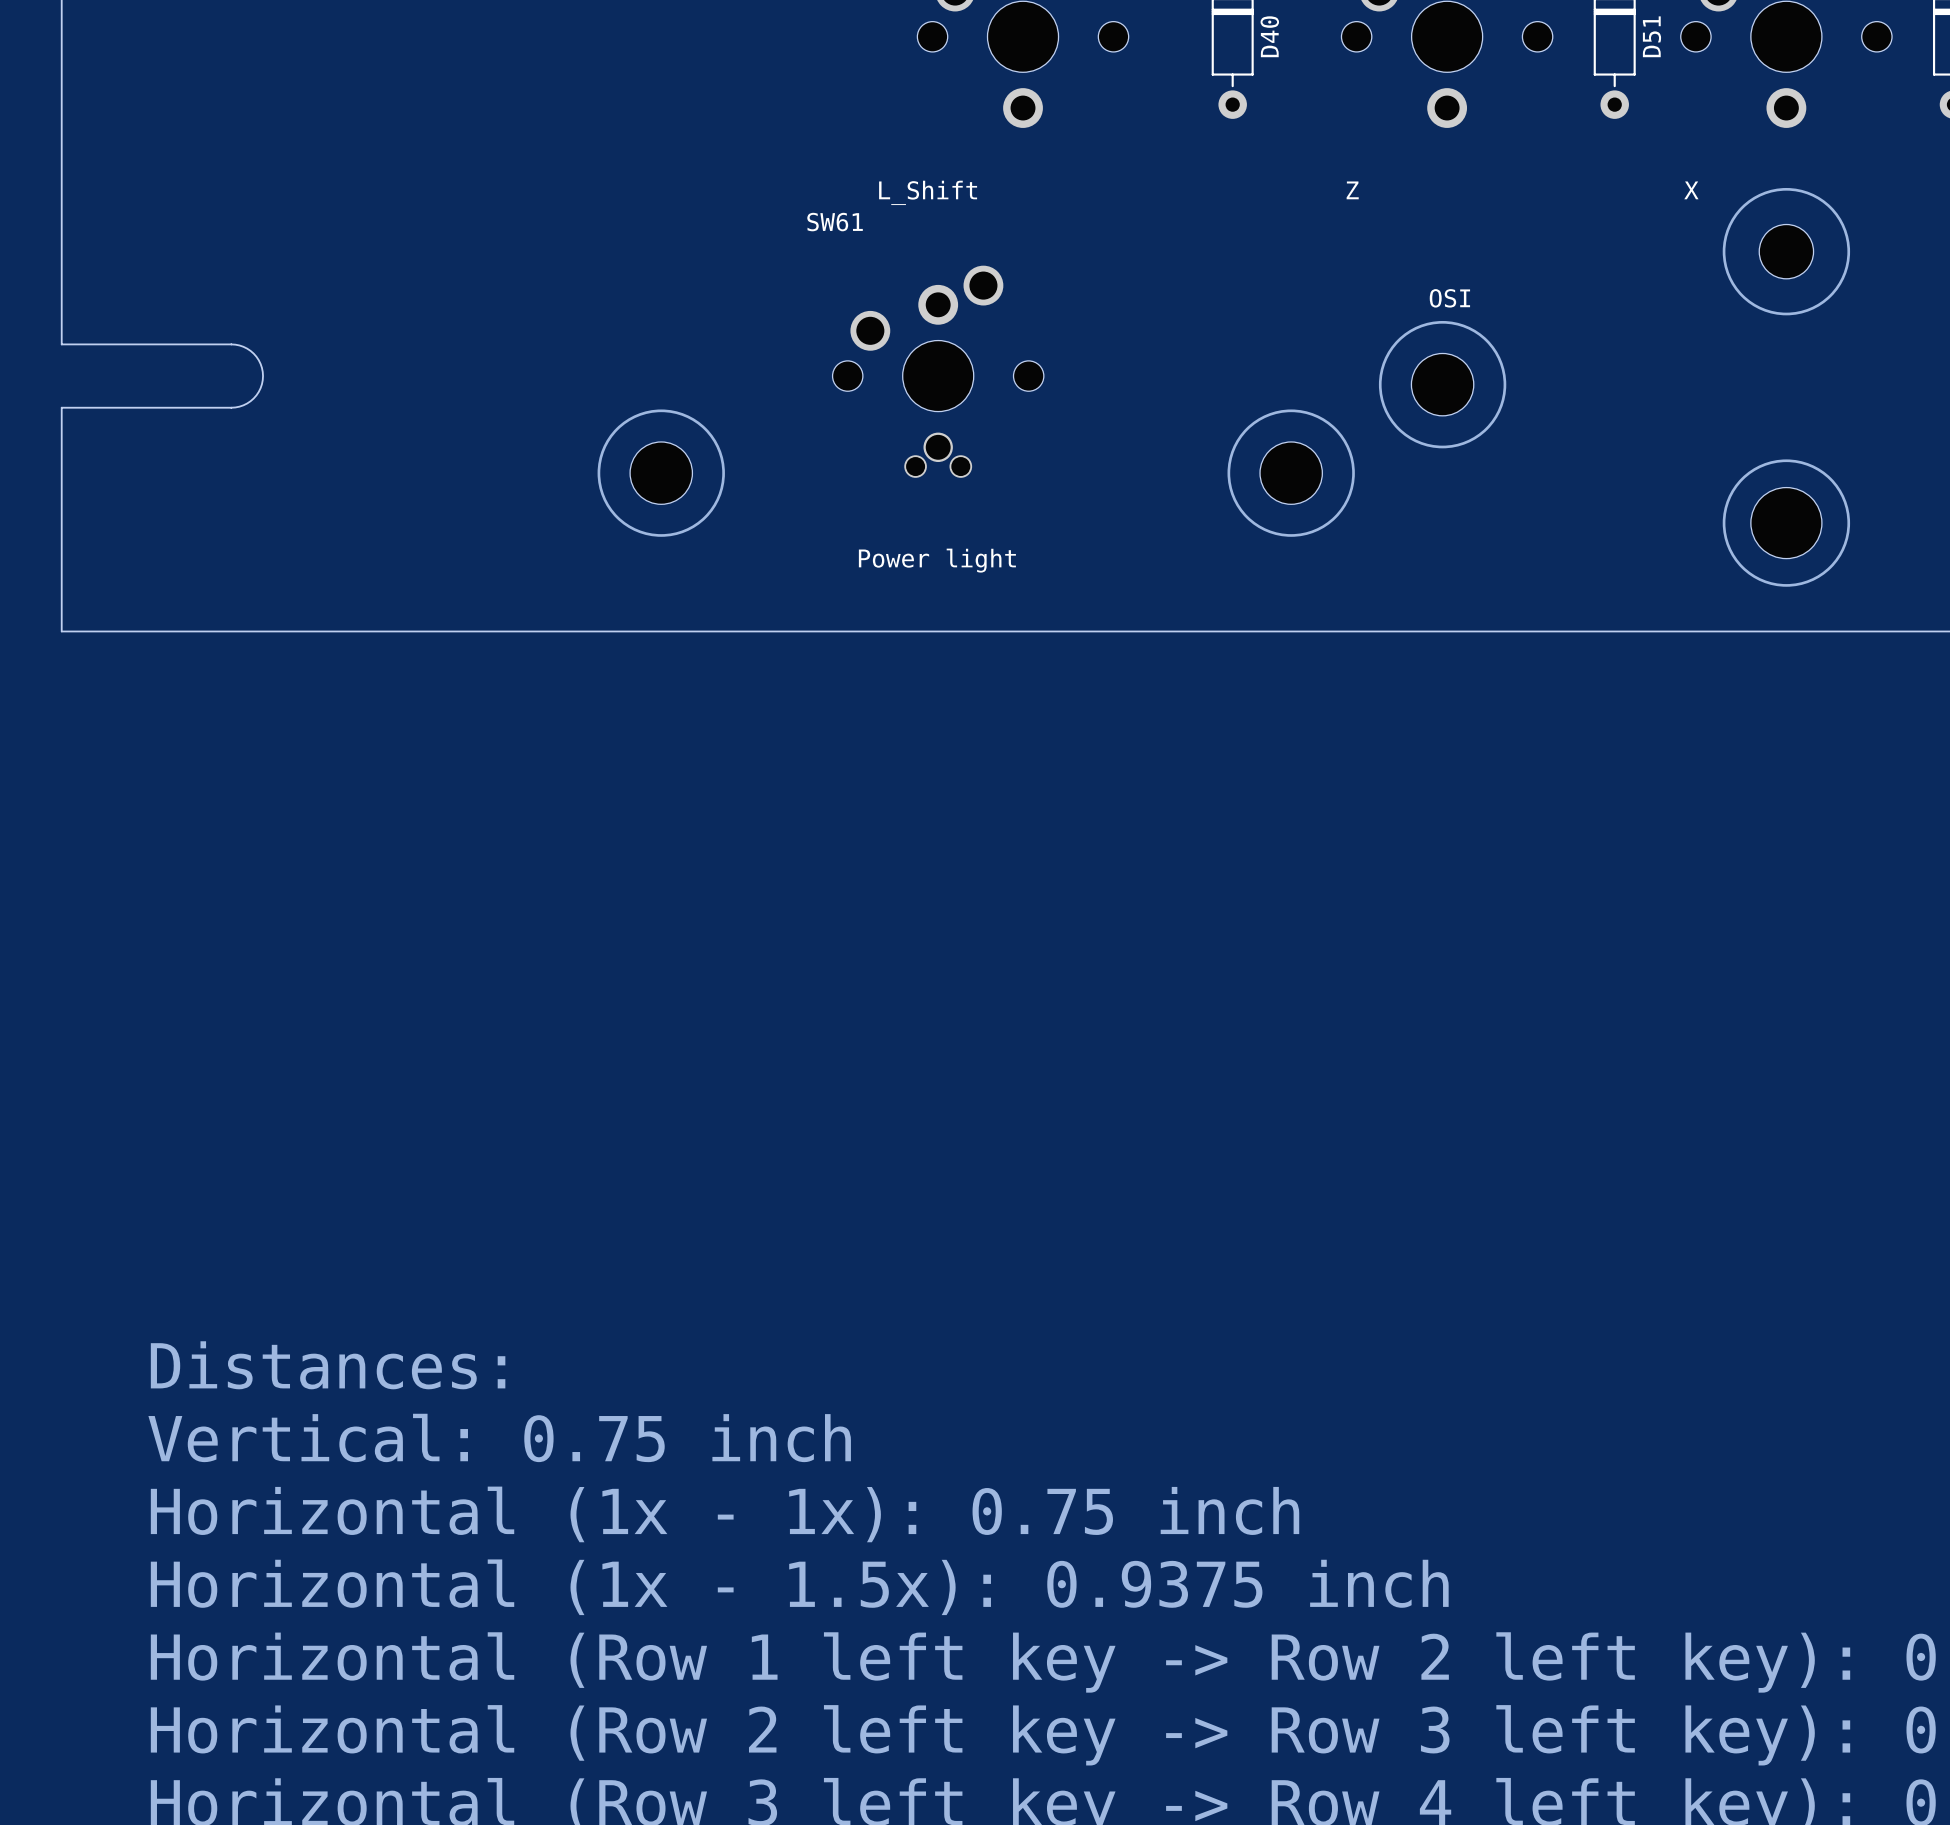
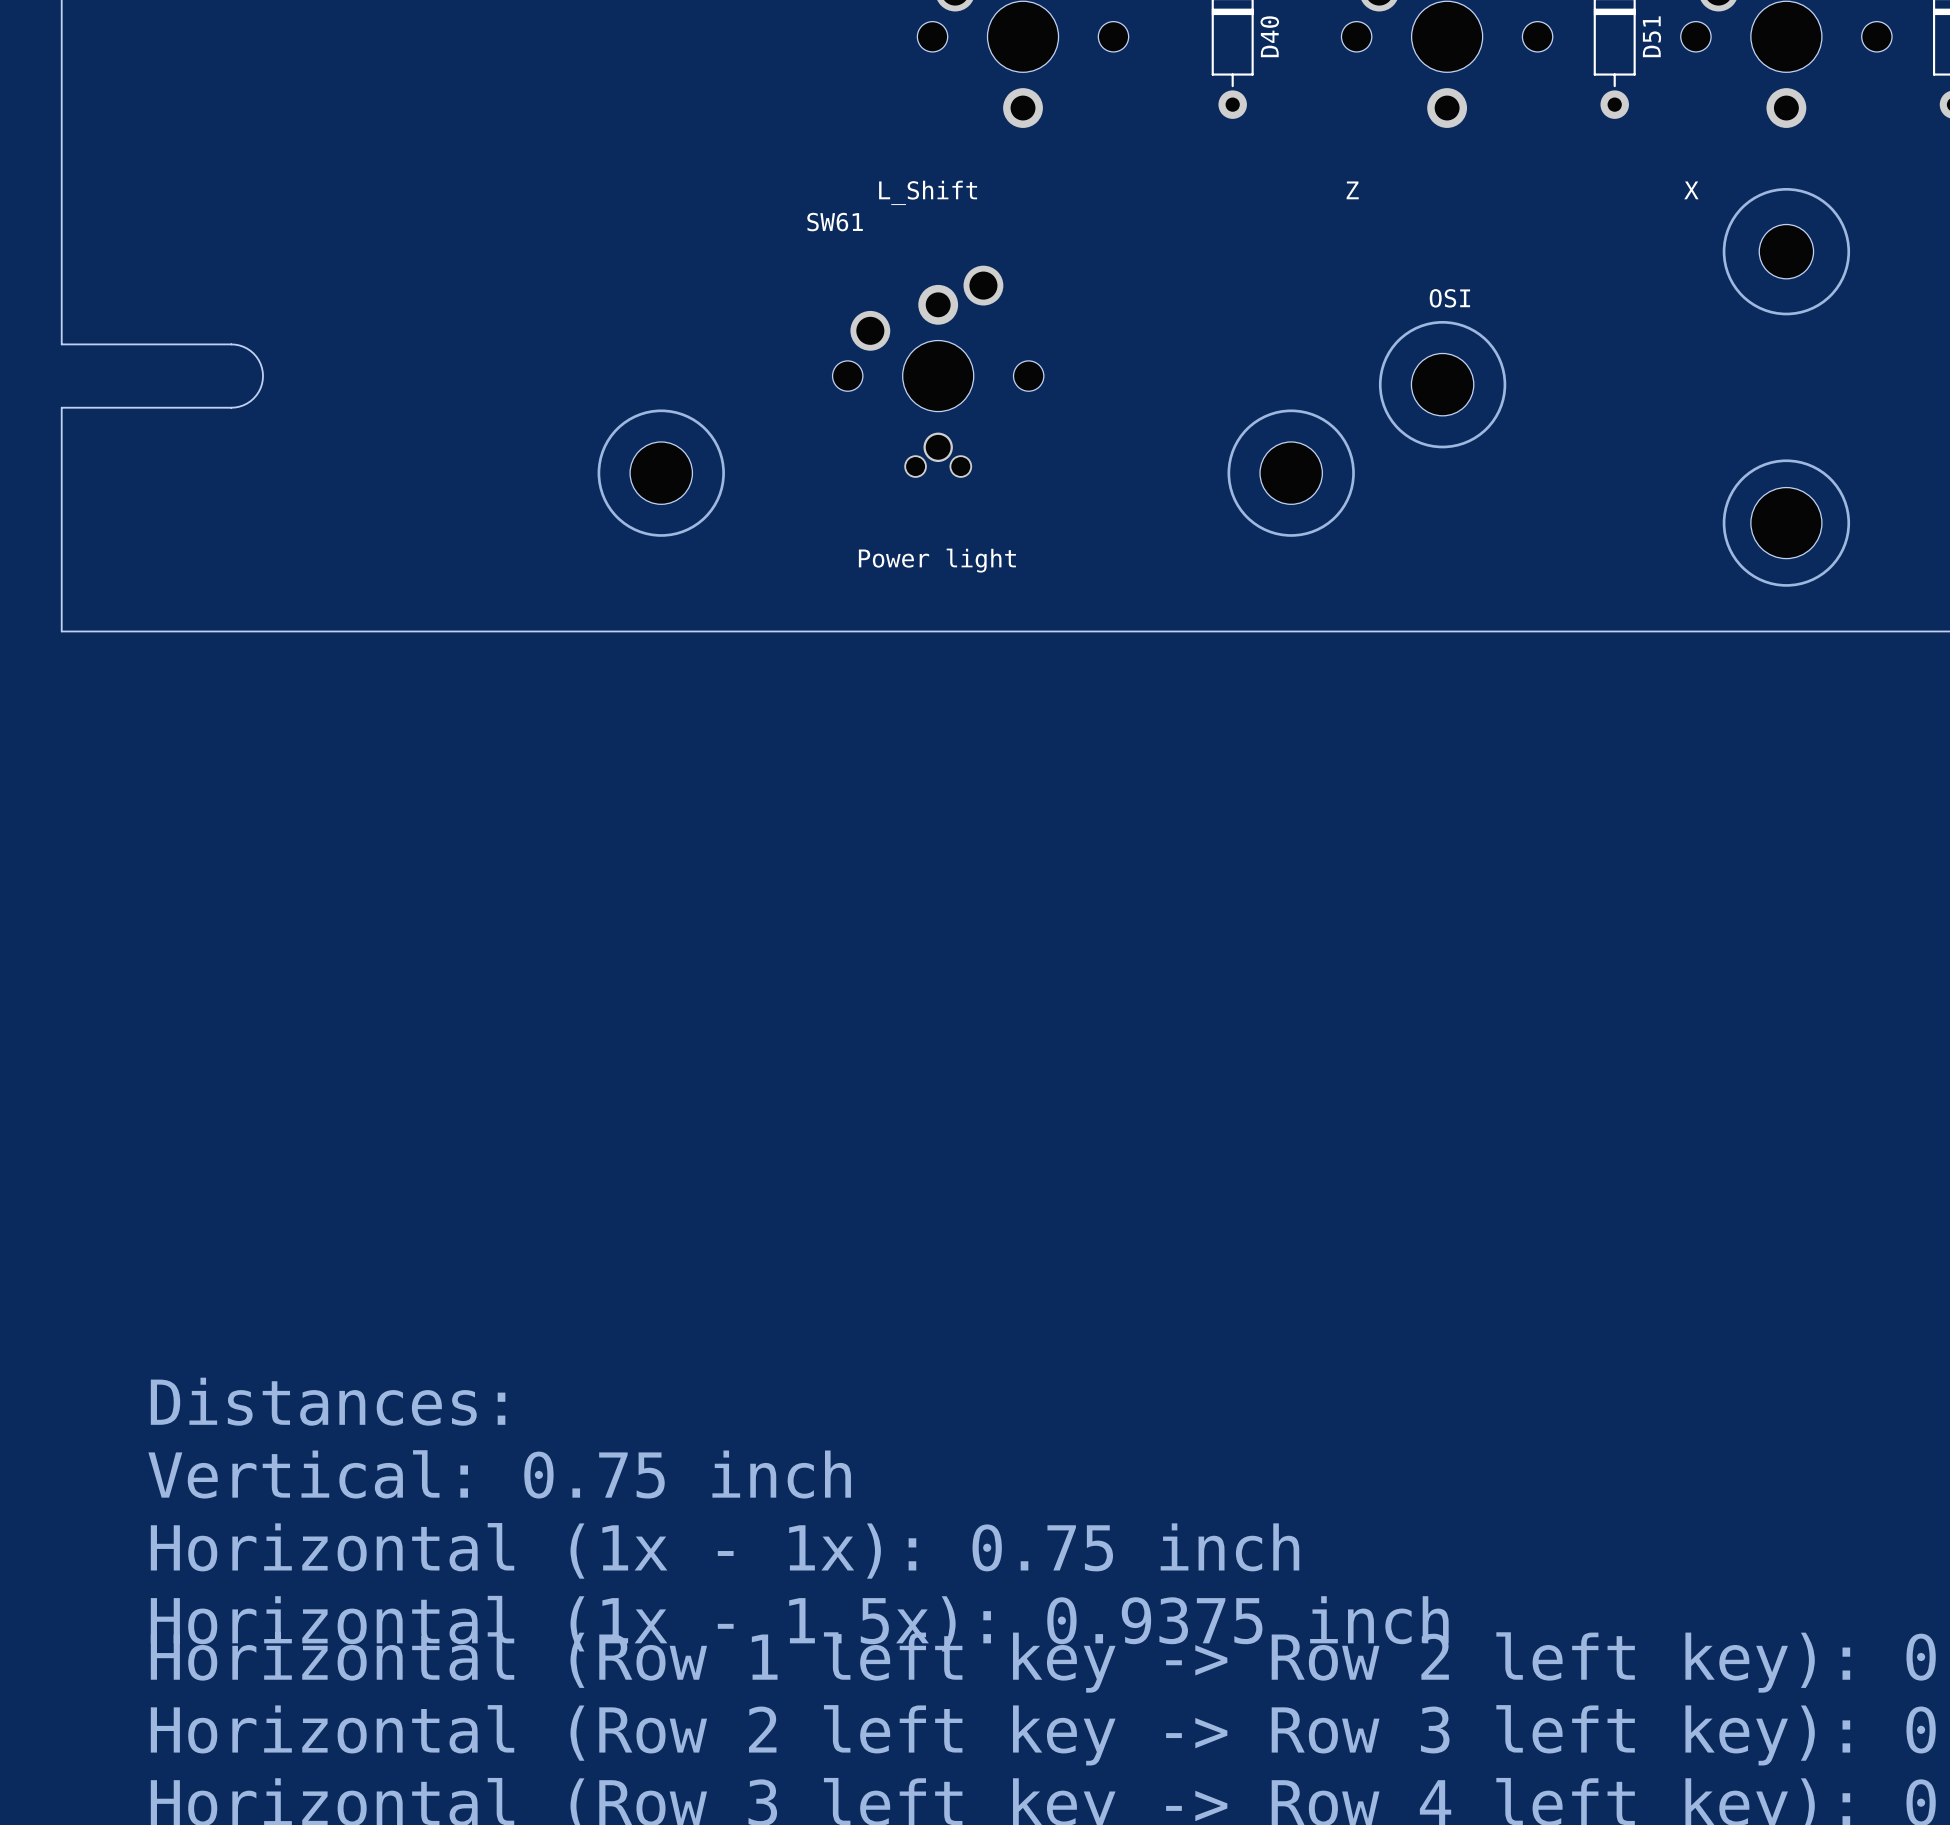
text position: Distances: (328, 1365) -> Distances: (328, 1401)
text position: Vertical: 0.75 inch (499, 1437) -> Vertical: 0.75 inch (499, 1474)
text position: Horizontal (1x - 1x): 0.75 inch (725, 1514) -> Horizontal (1x - 1x): 0.75 inch (725, 1550)
text position: Horizontal (1x - 1.5x): 0.9375 inch (799, 1587) -> Horizontal (1x - 1.5x): 0.9375 inch (799, 1623)

